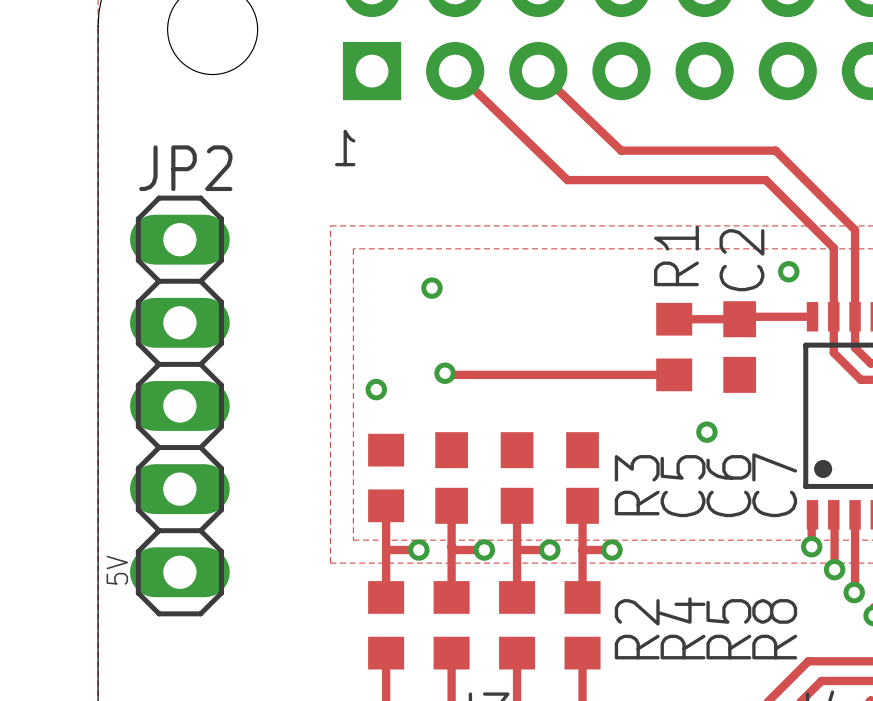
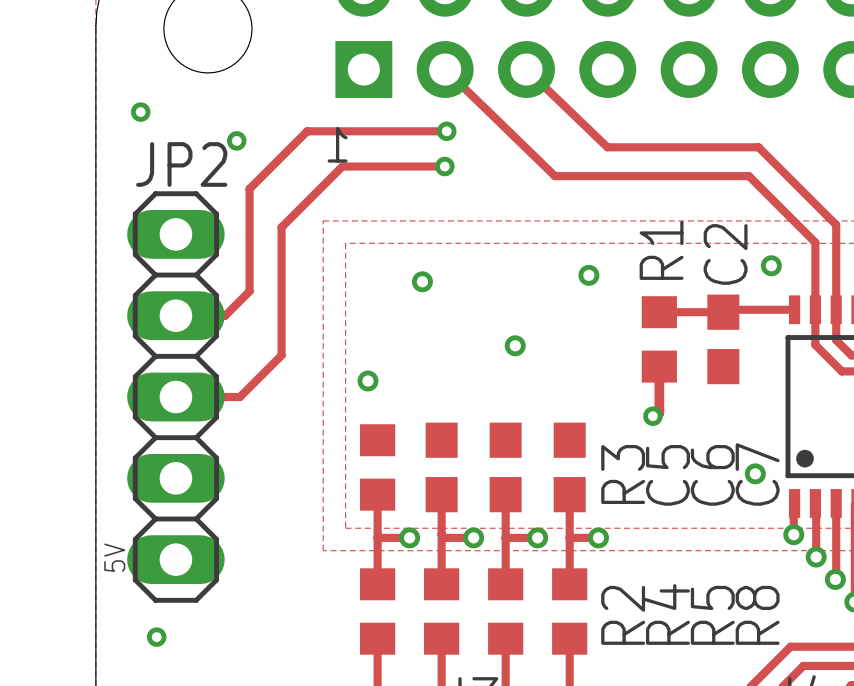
via: none -> (140, 112)
track: none -> (446, 131) (307, 131) (249, 188) (249, 291) (225, 315) (175, 315)
via: none -> (446, 131)
via: none -> (236, 140)
track: none -> (444, 166) (342, 166) (281, 227) (281, 355) (239, 397) (175, 397)
via: none -> (444, 166)
via: none -> (588, 275)
track: (445, 373) (449, 374) (674, 374) -> (652, 416) (659, 413) (659, 366)
via position: (445, 373) -> (515, 345)
via: none -> (652, 416)
via position: (706, 432) -> (755, 473)
via: none -> (156, 637)

